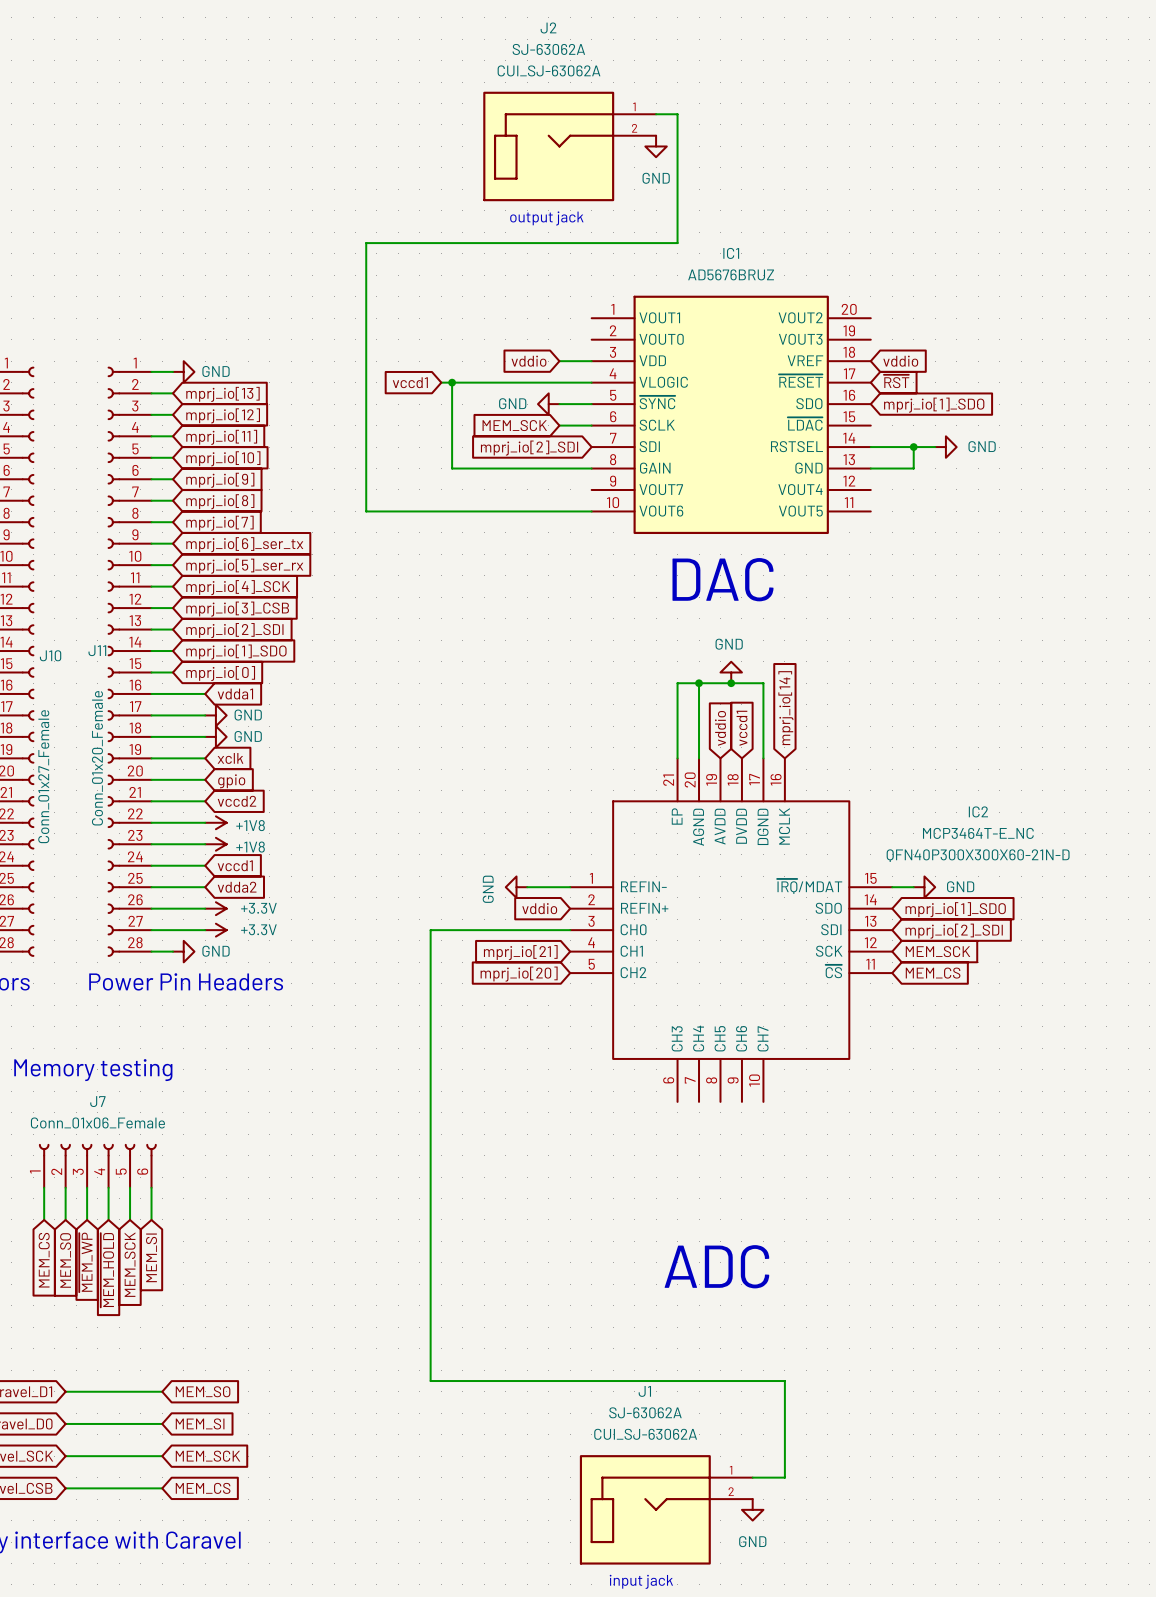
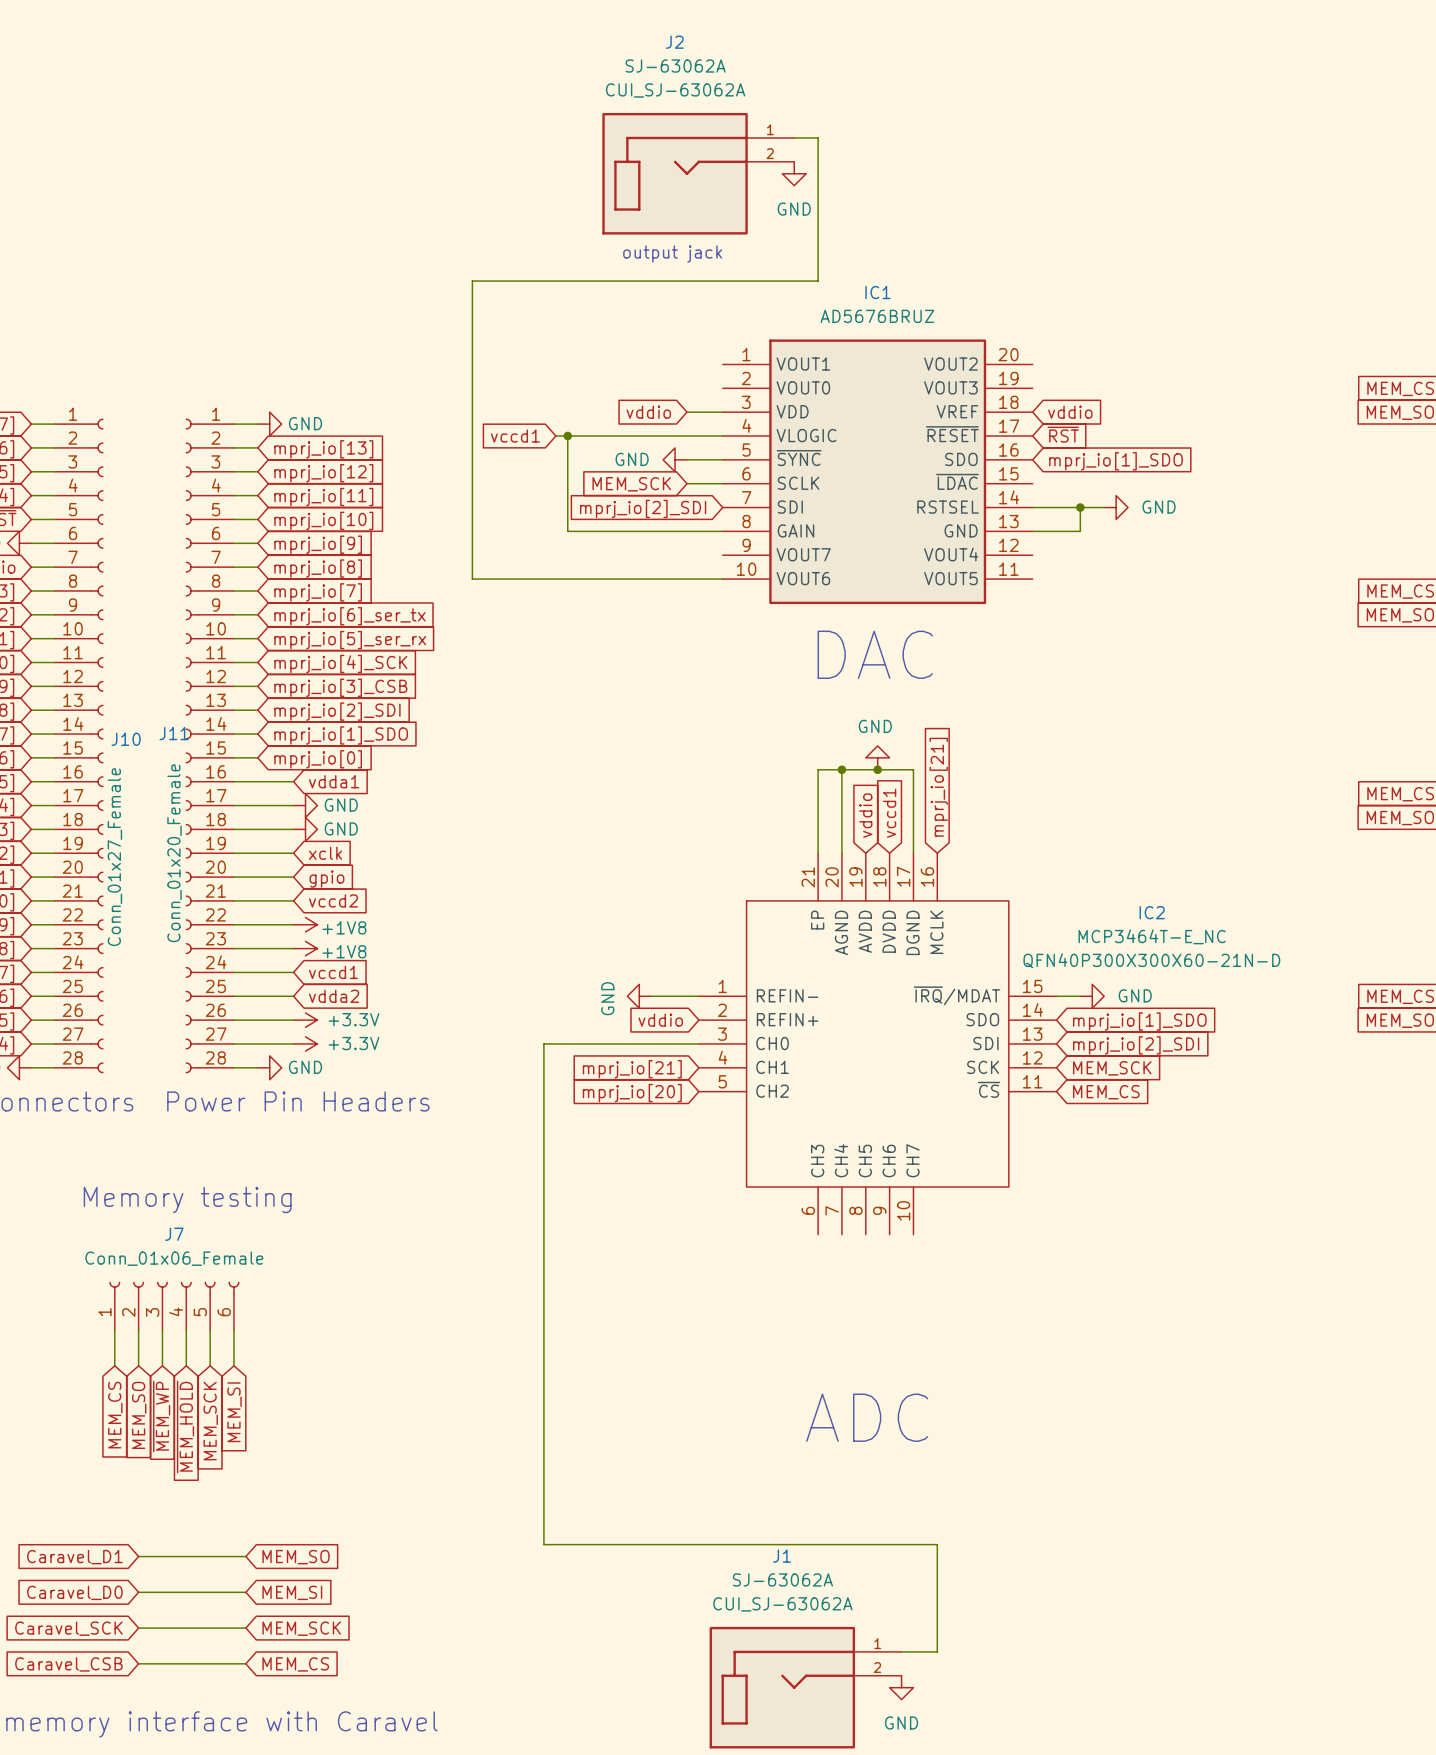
global label: mprj_io[14] (785, 708) -> mprj_io[21] (938, 787)

